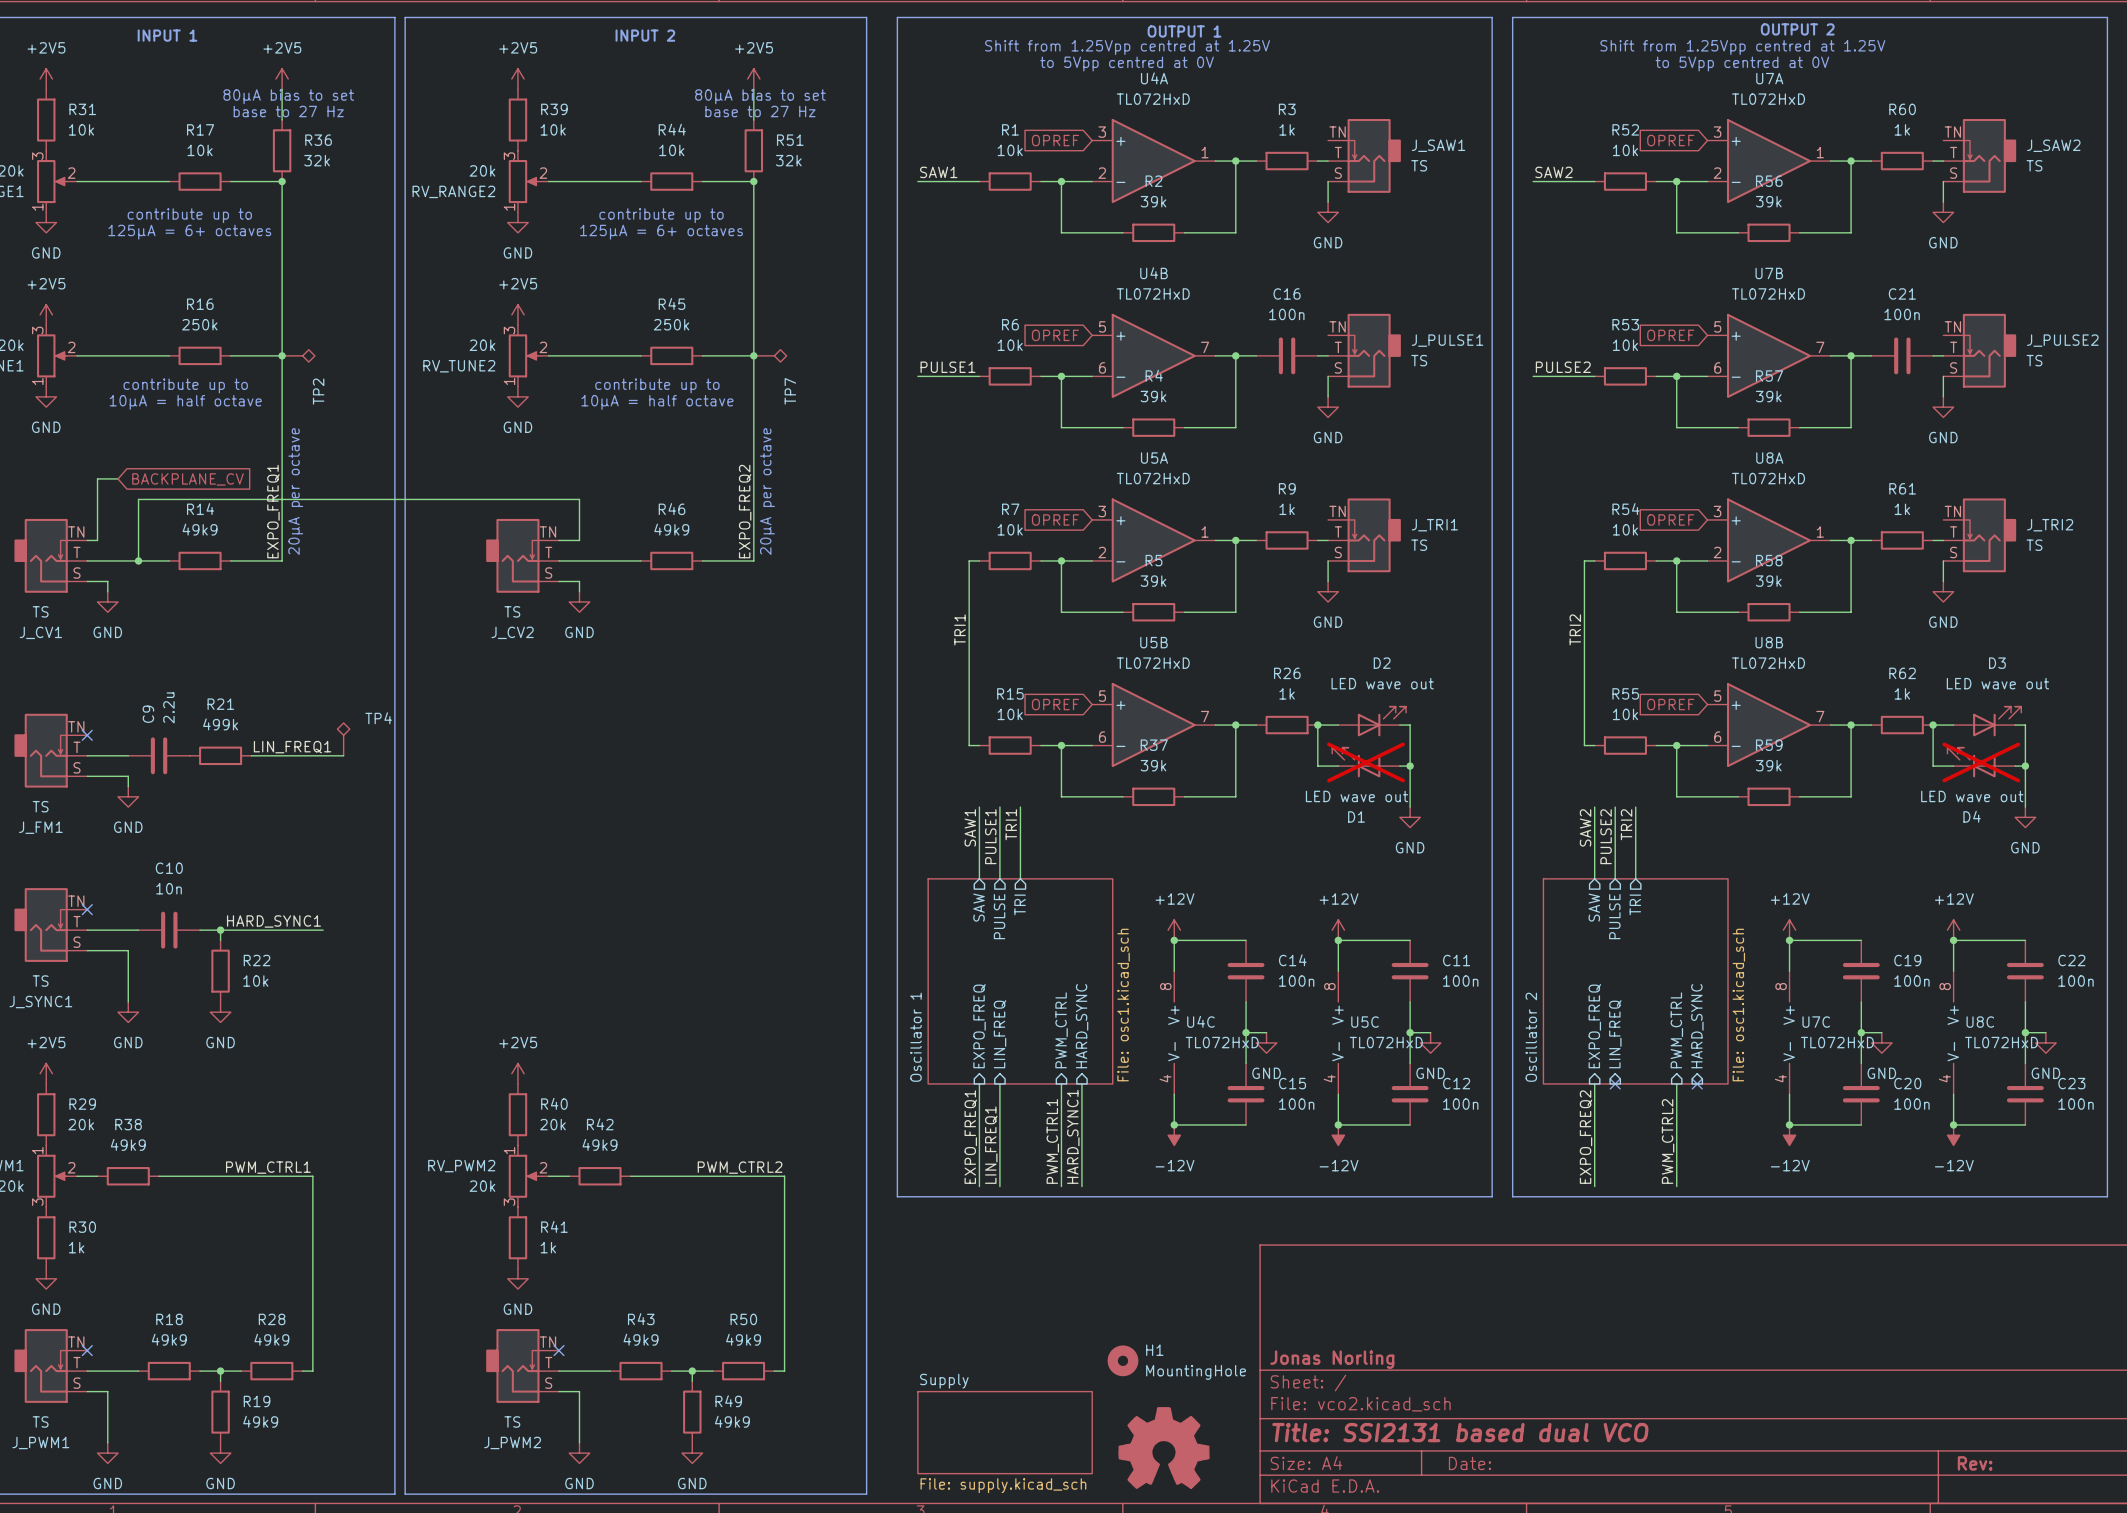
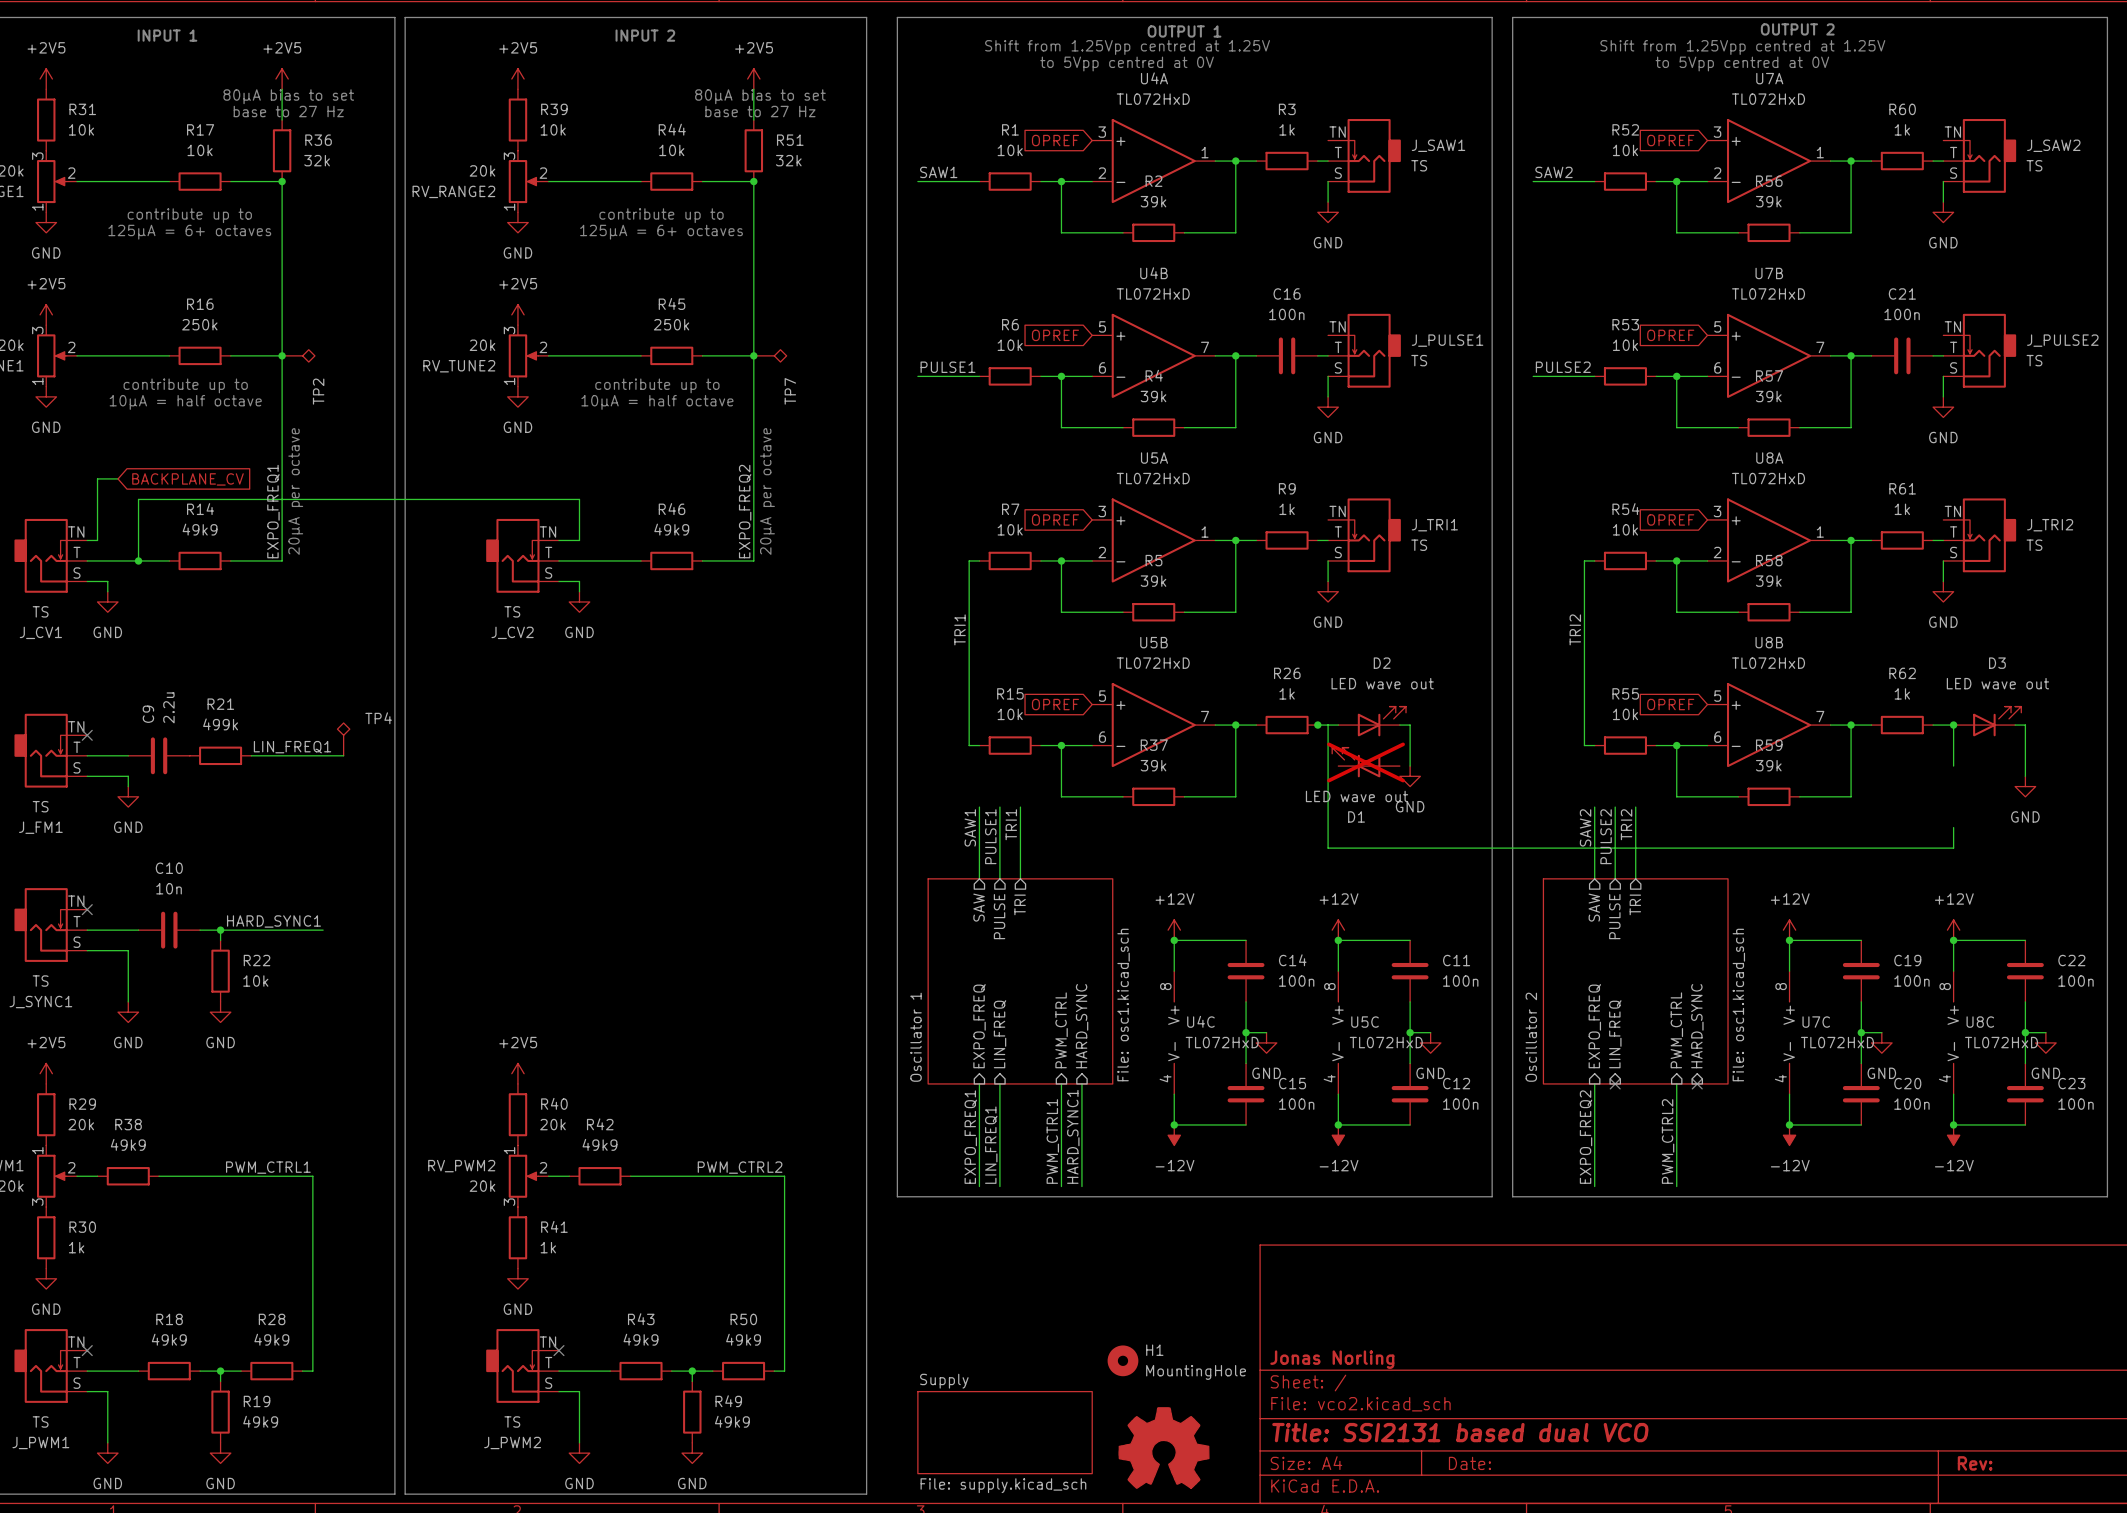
wire: (1317, 725) (1317, 766) (1338, 766) -> none
wire: none -> (1328, 725) (1328, 848) (1953, 848) (1953, 827)
wire: (1933, 725) (1933, 766) (1953, 766) -> (1953, 725) (1953, 766)
junction position: (1933, 725) -> (1953, 725)
D4: LED wave out (1981, 762) -> none
wire: (1399, 766) (1410, 766) (1410, 807) -> none
junction: (1410, 766) -> none
wire: (2015, 766) (2025, 766) -> none
junction: (2025, 766) -> none
wire: (2025, 776) (2025, 807) -> none
power symbol position: GND (1410, 817) -> GND (1410, 776)
power symbol position: GND (2025, 817) -> GND (2025, 786)

